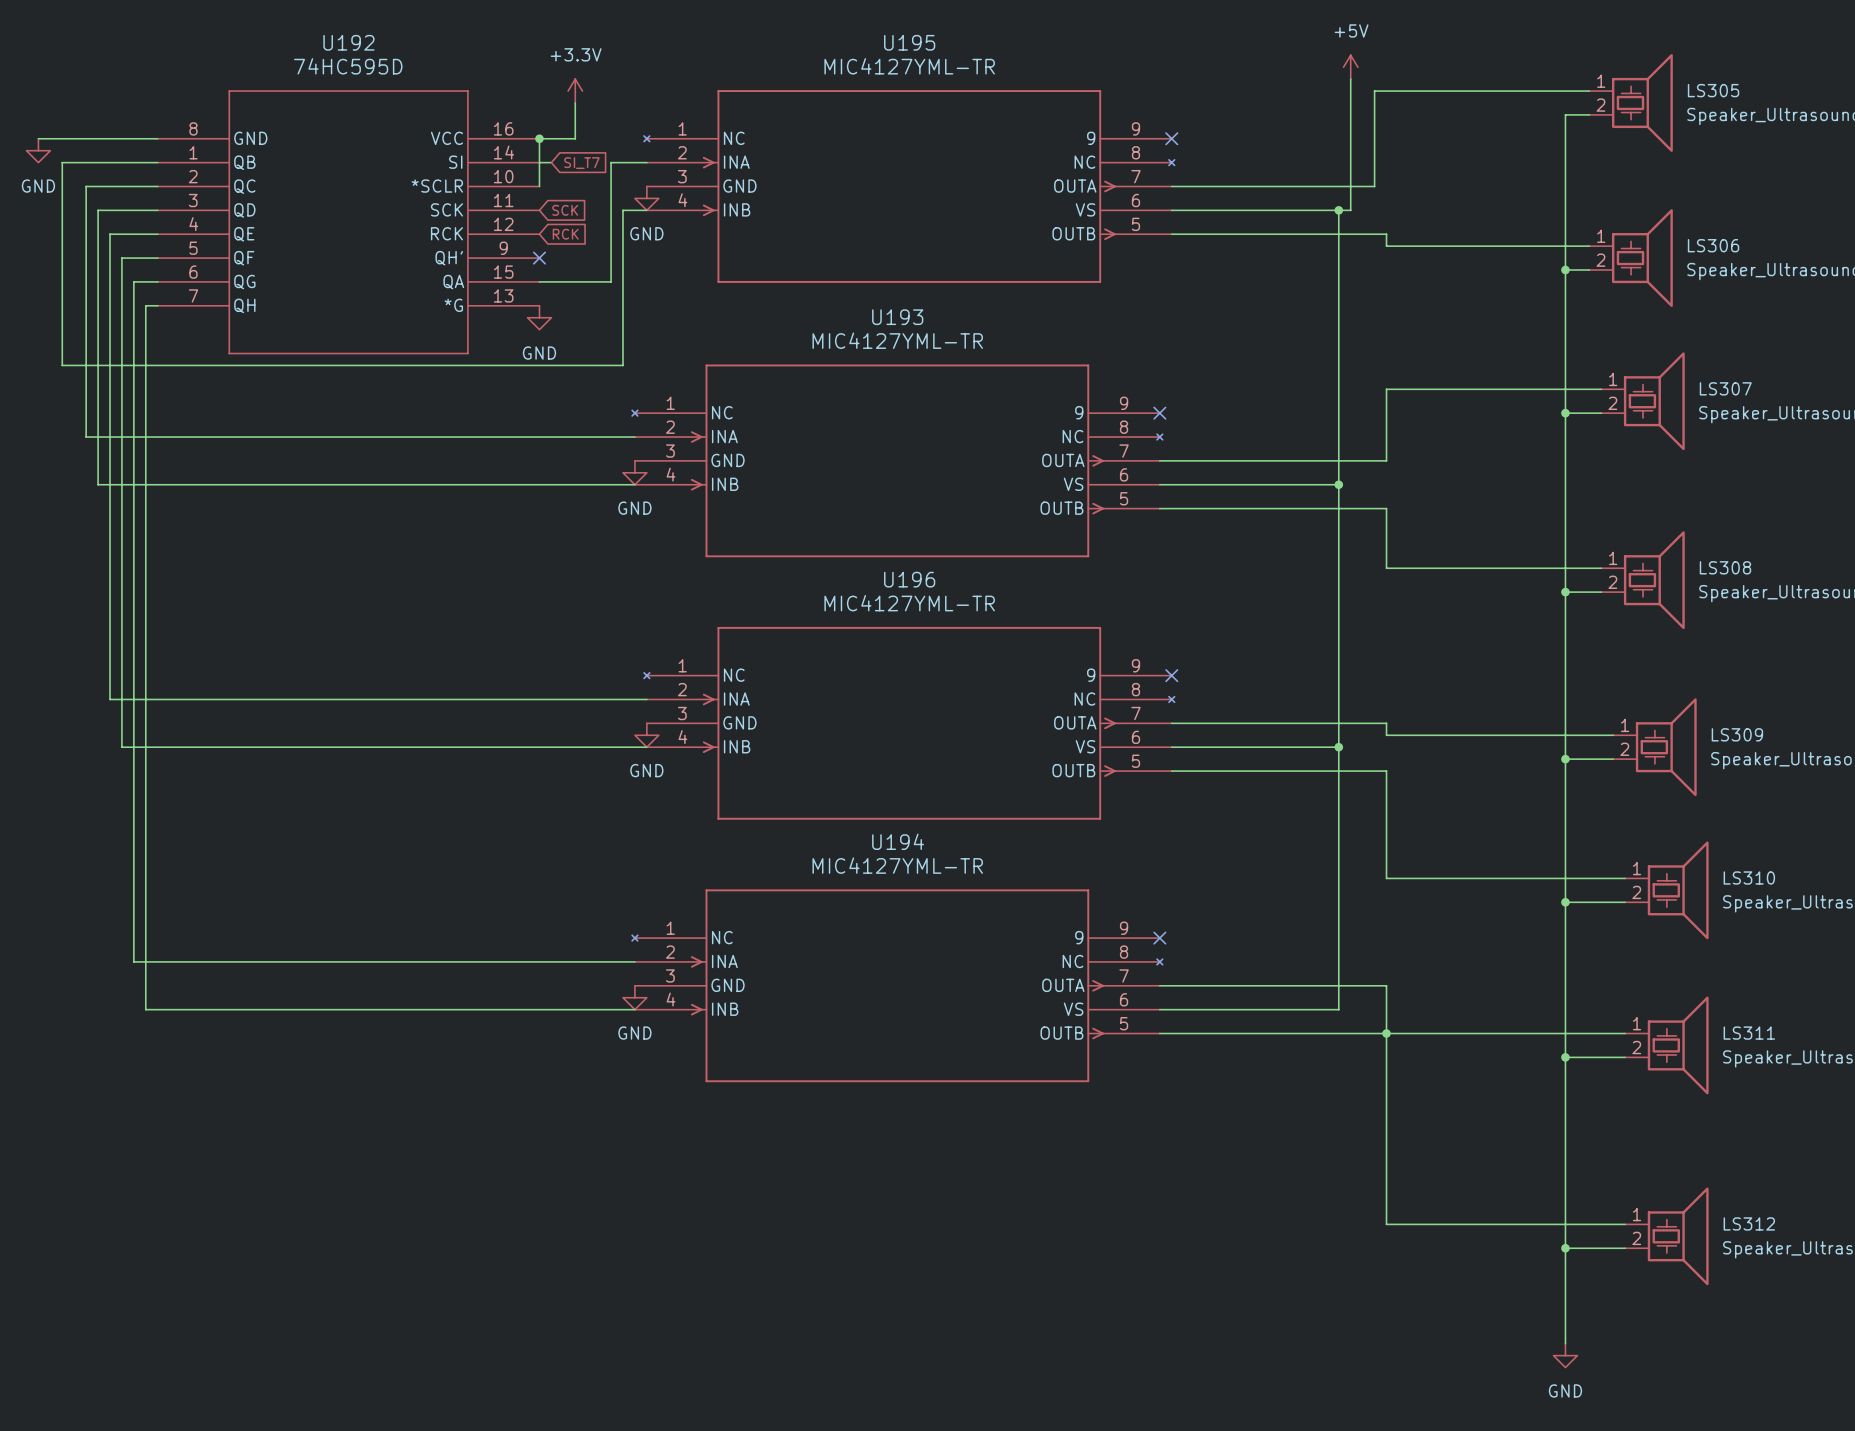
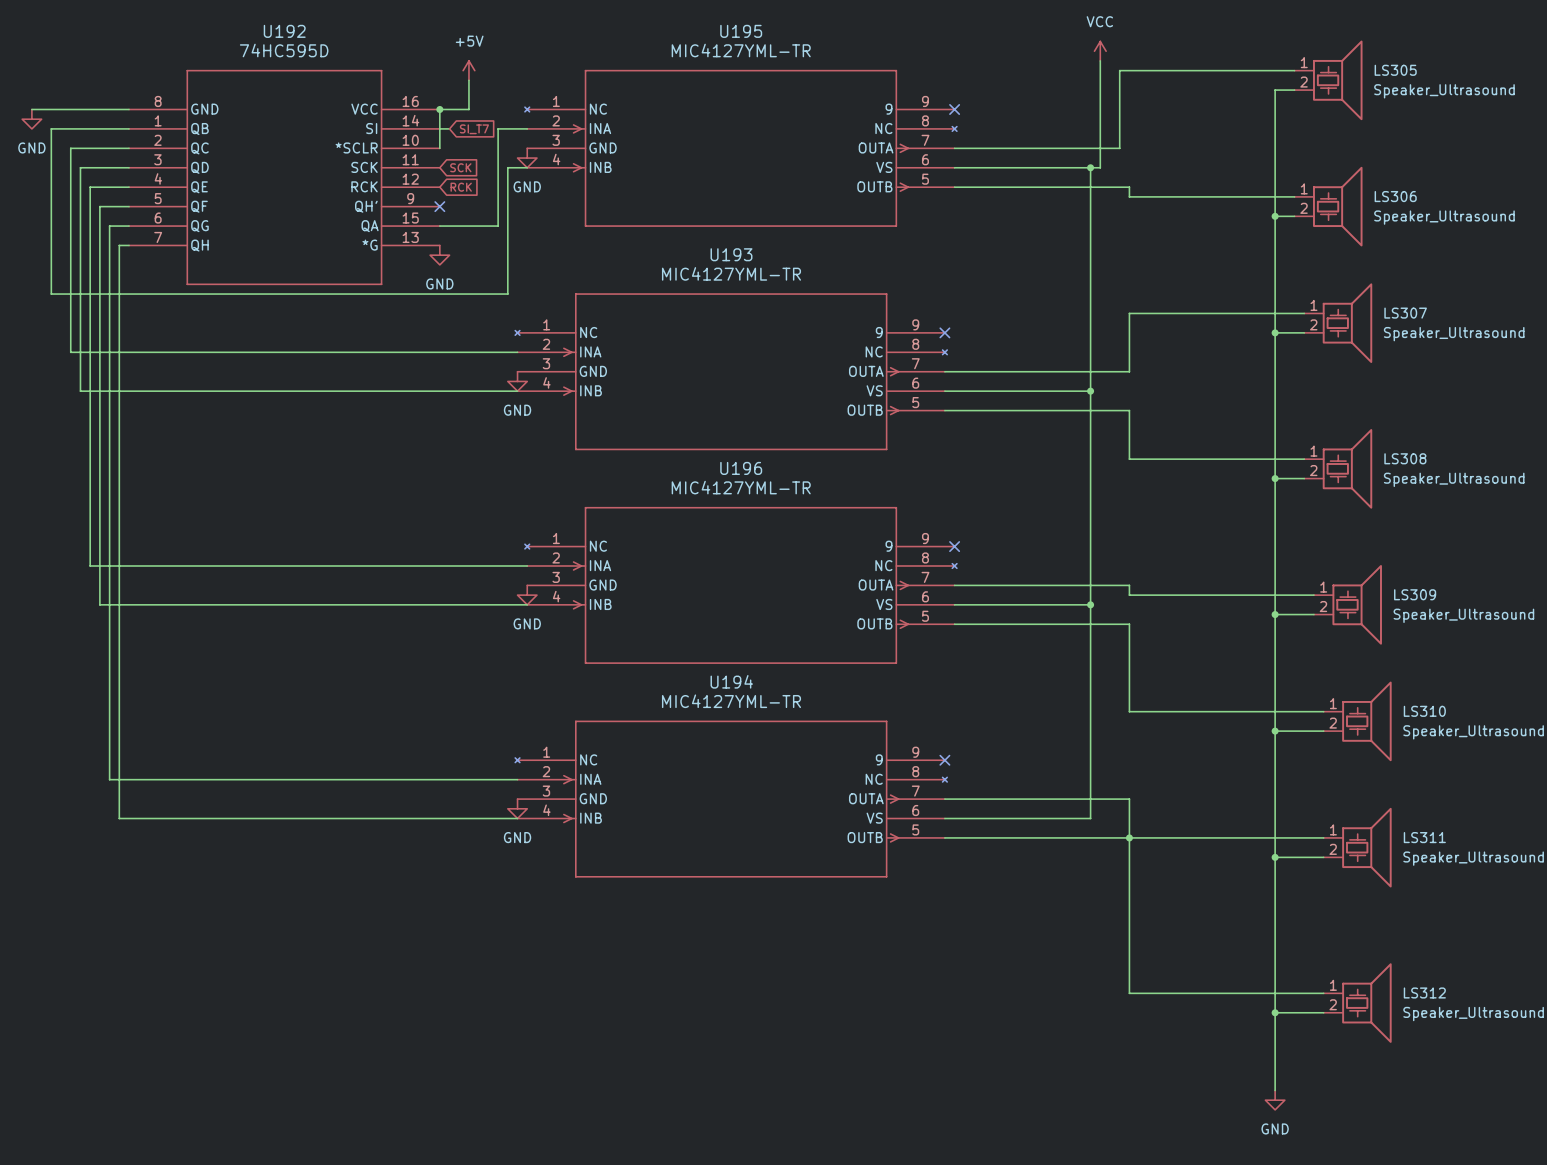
power symbol: +5V (1350, 67) -> VCC (1100, 51)
power symbol: +3.3V (575, 91) -> +5V (468, 70)

